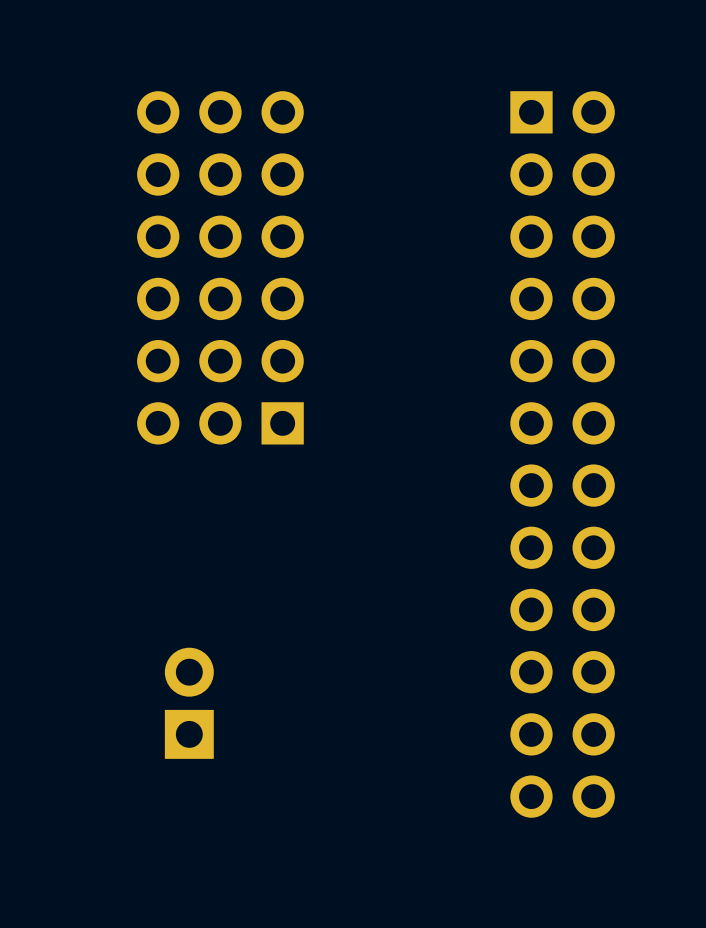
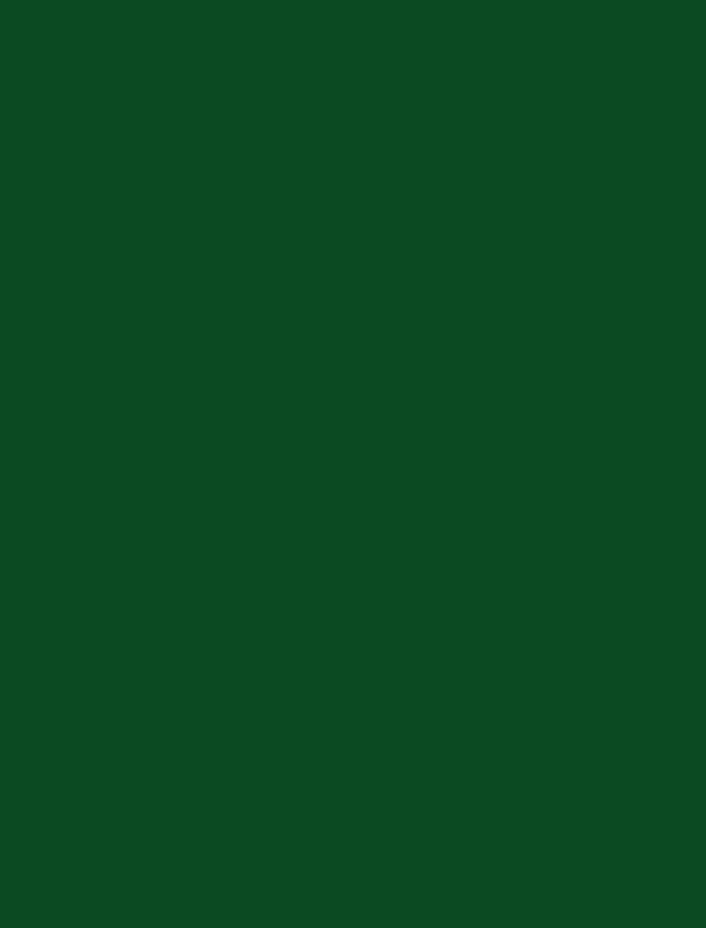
part: (220, 267) -> none
part: (562, 454) -> none
part: (189, 703) -> none

